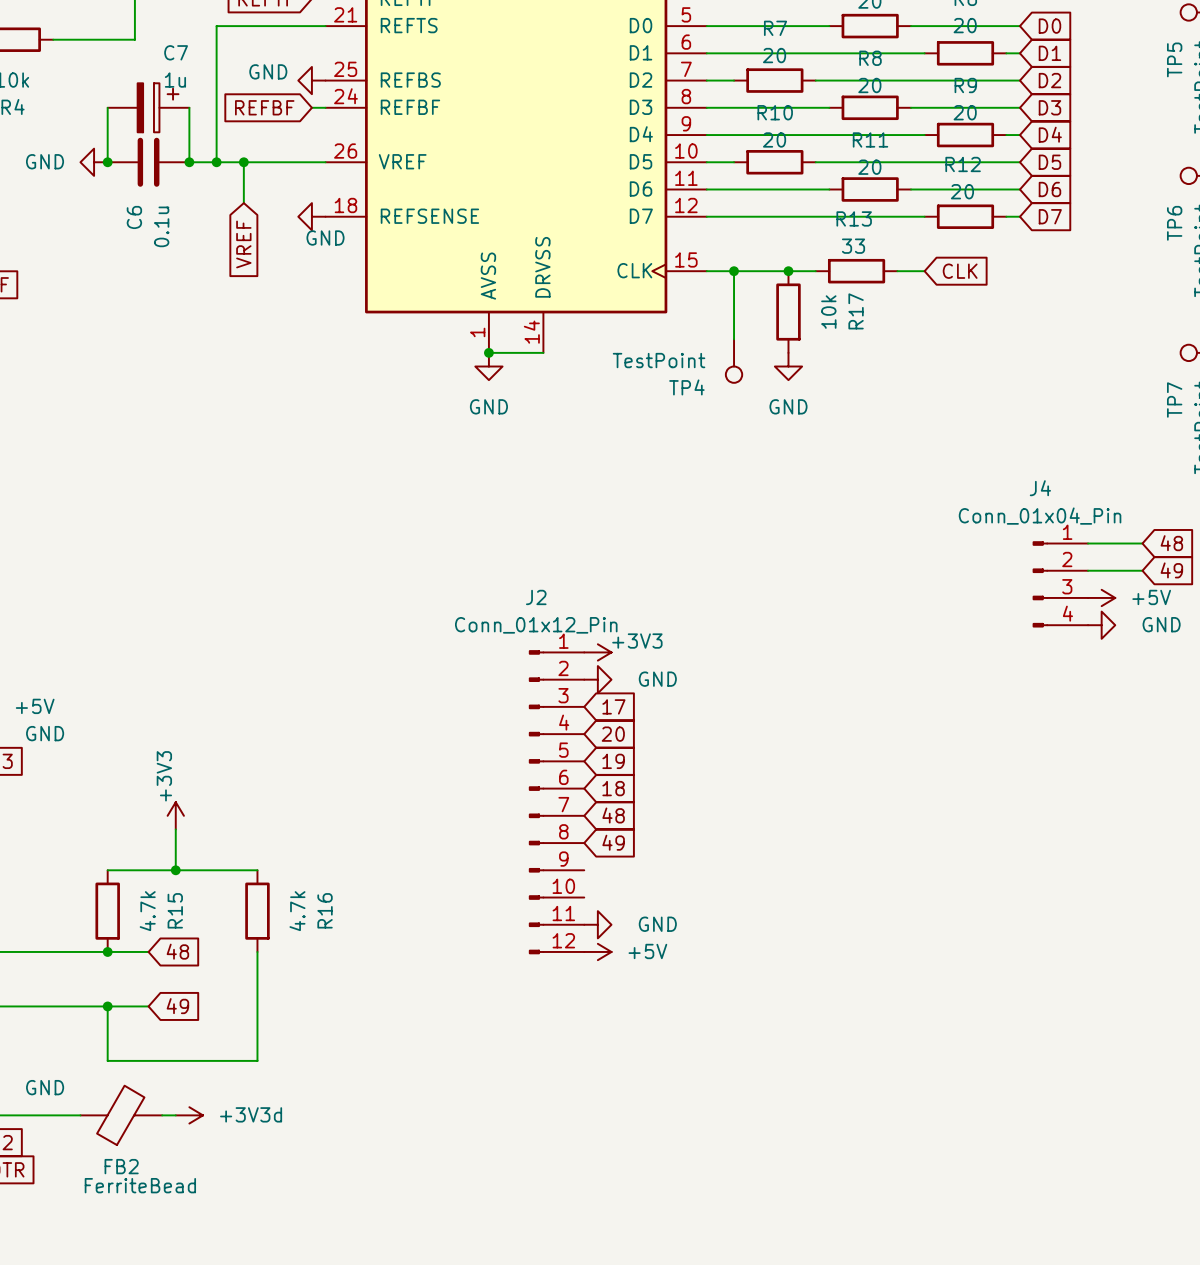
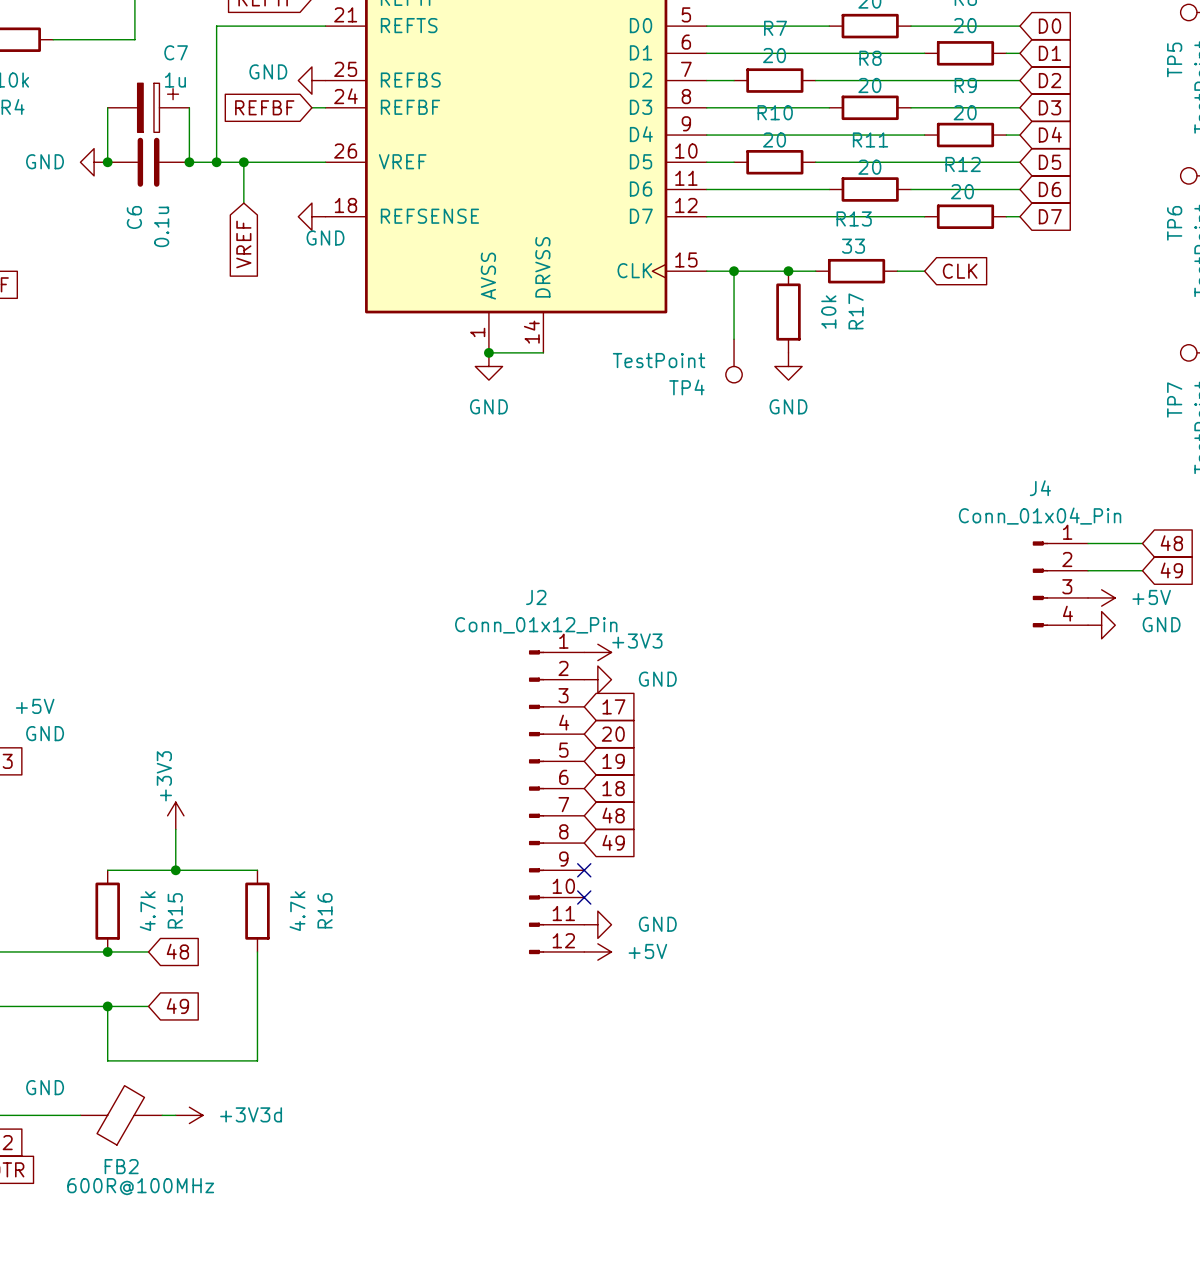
no-connect mark: none -> (584, 870)
no-connect mark: none -> (584, 897)
FB2 value: FerriteBead (140, 1185) -> 600R@100MHz (140, 1186)

